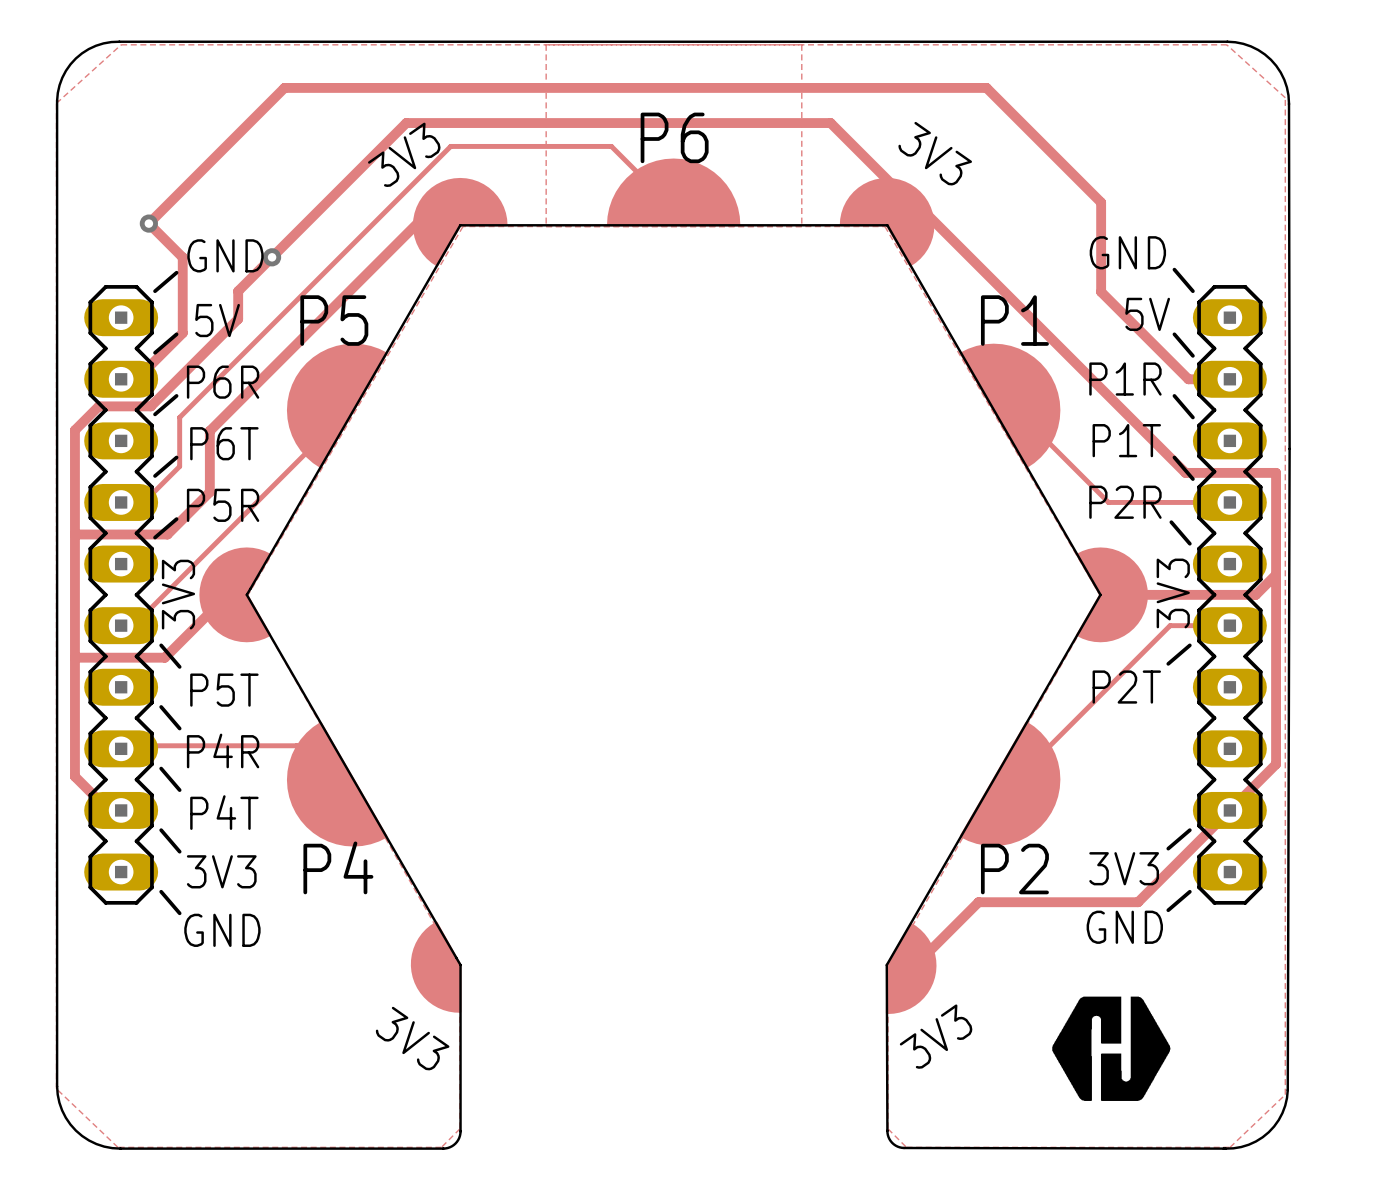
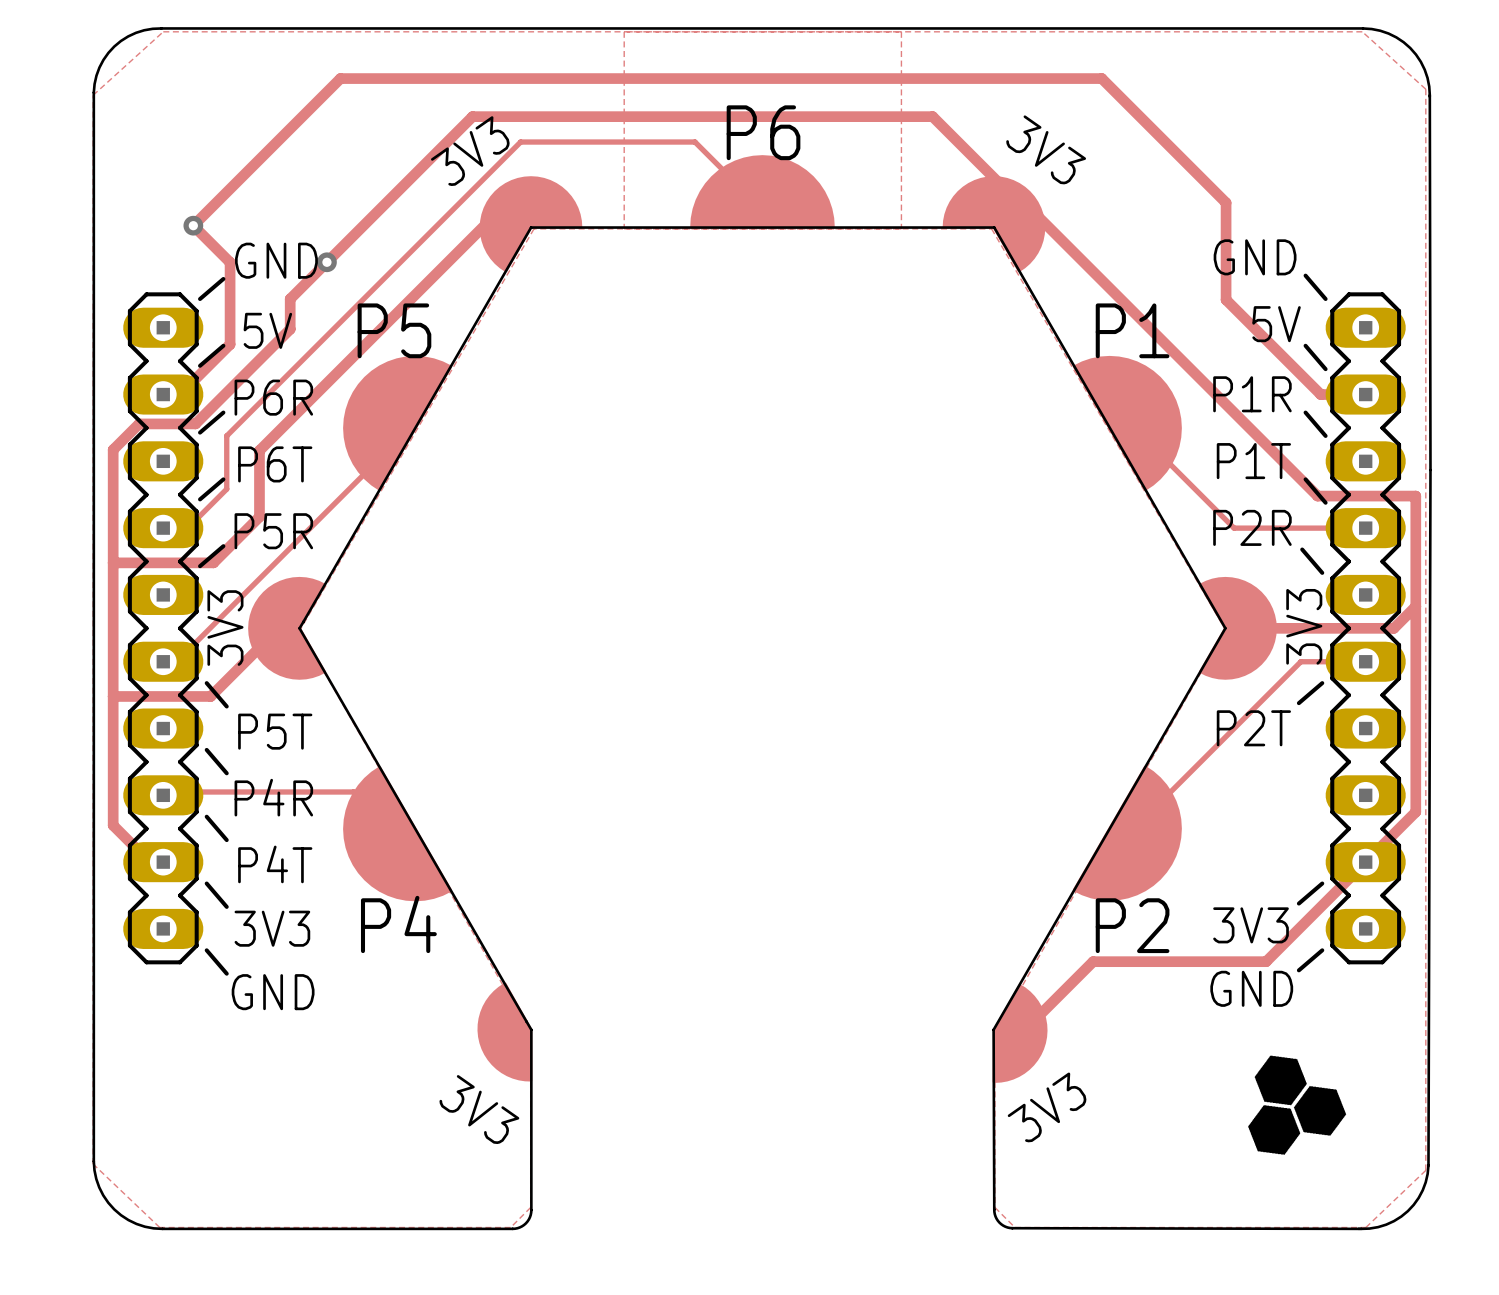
drawing: none -> [1248, 1055, 1347, 1155]
drawing: [1052, 996, 1171, 1101] -> none

